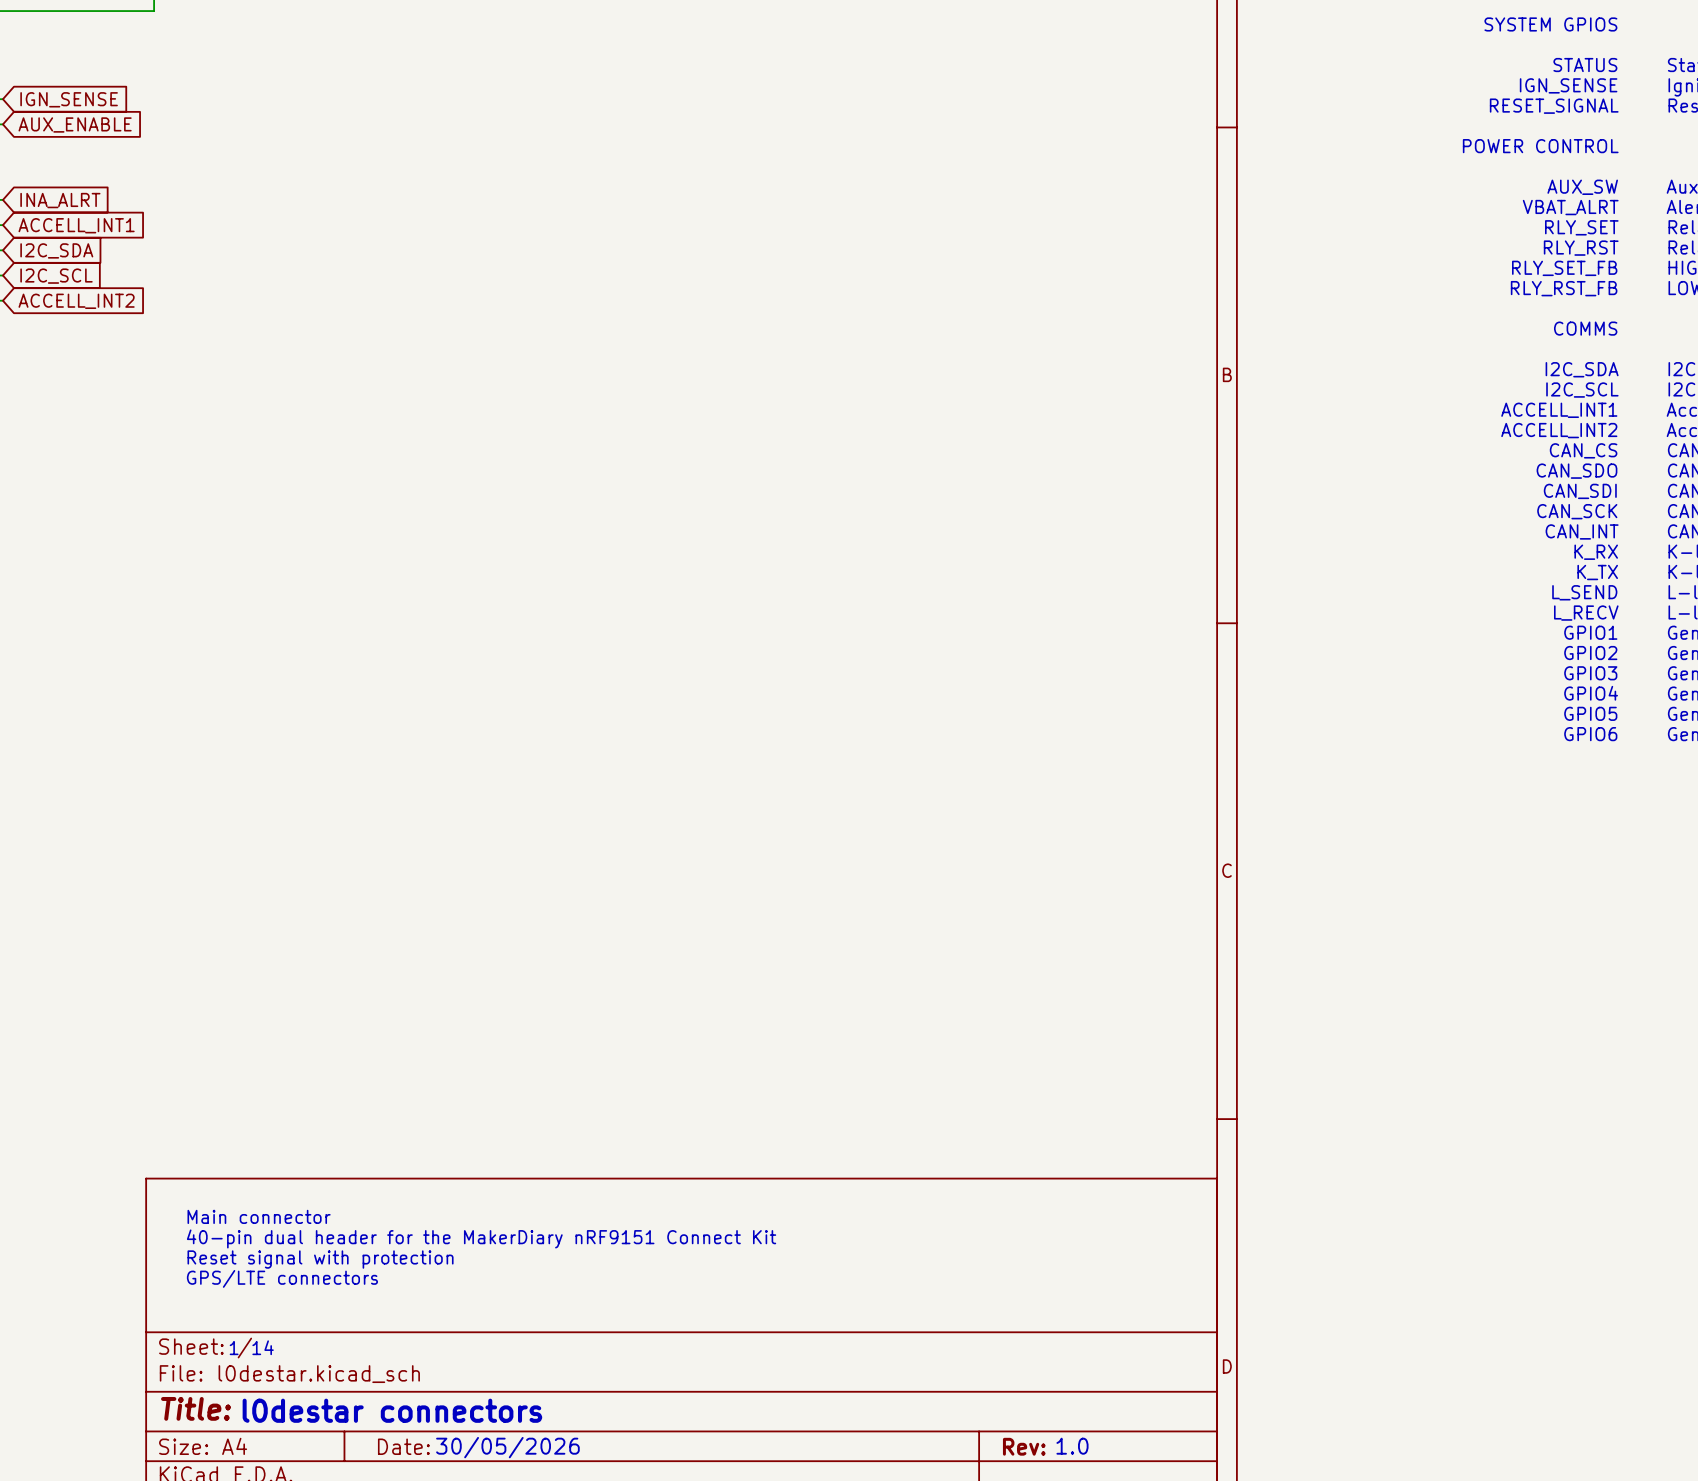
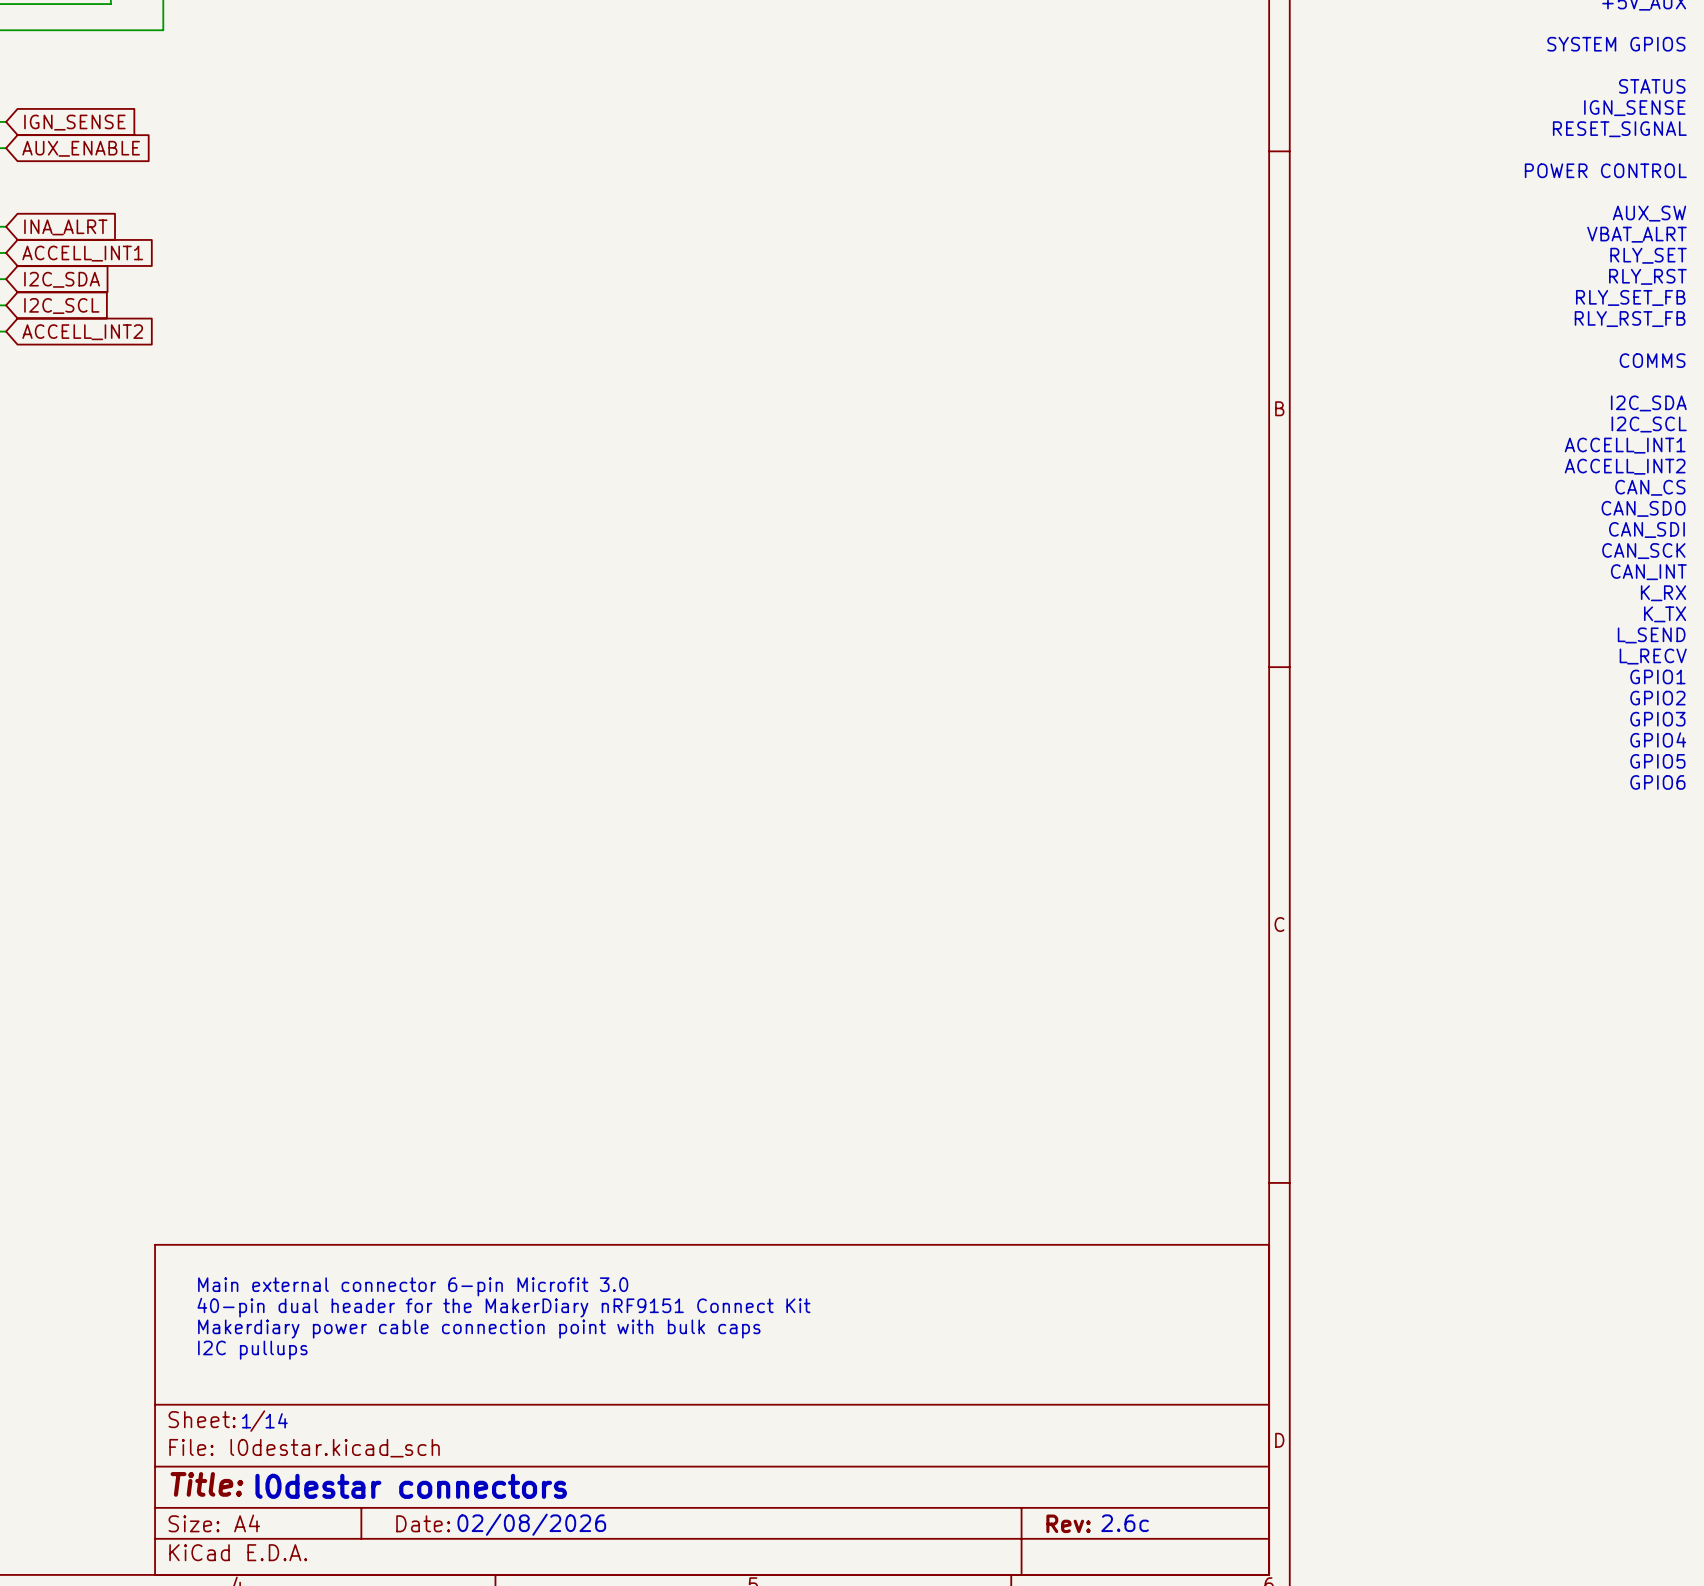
text: Main connector (259, 1216) -> Main external connector 6-pin Microfit 3.0 (413, 1286)
text: Reset signal with protection (320, 1259) -> Makerdiary power cable connection point with bulk caps (479, 1329)
text: GPS/LTE connectors (282, 1278) -> I2C pullups (252, 1350)
text: 1.0 (1072, 1446) -> 2.6c (1125, 1523)
text: 30/05/2026 (507, 1447) -> 02/08/2026 (531, 1524)

